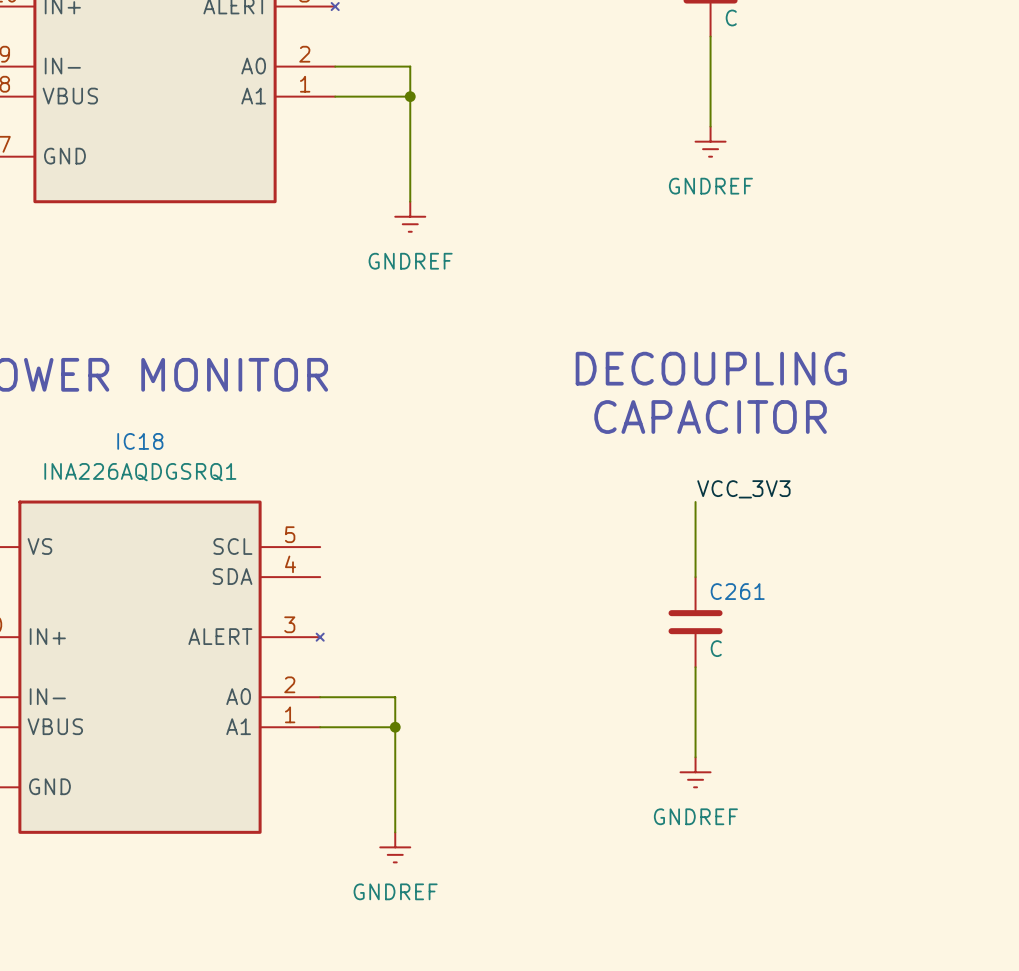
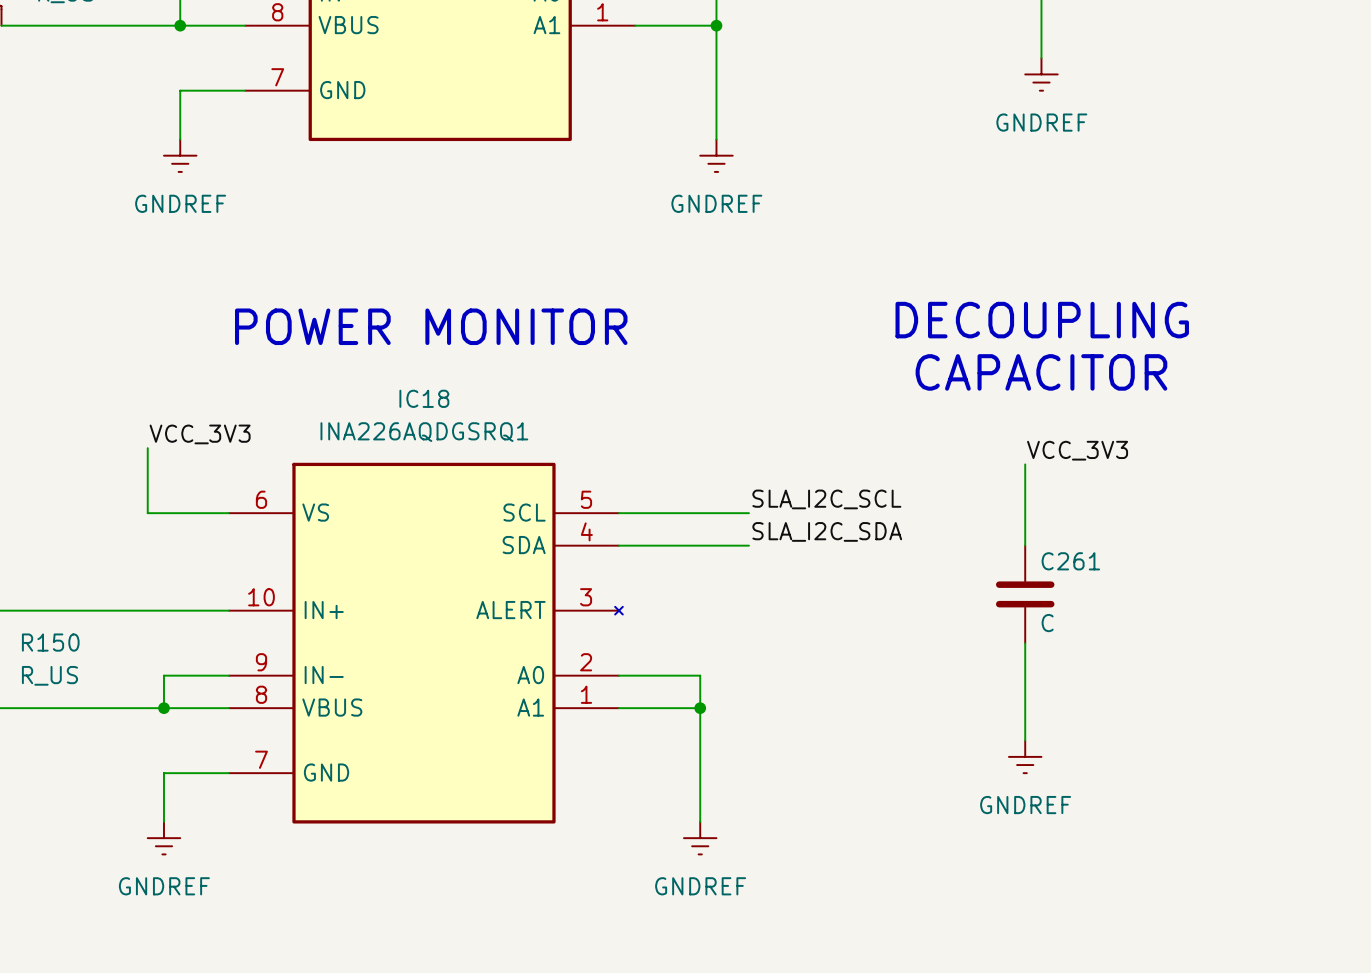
label: none -> SLA_I2C_SCL (826, 499)
wire: none -> (618, 513) (748, 513)
label: none -> SLA_I2C_SDA (827, 531)
wire: none -> (618, 545) (748, 545)

